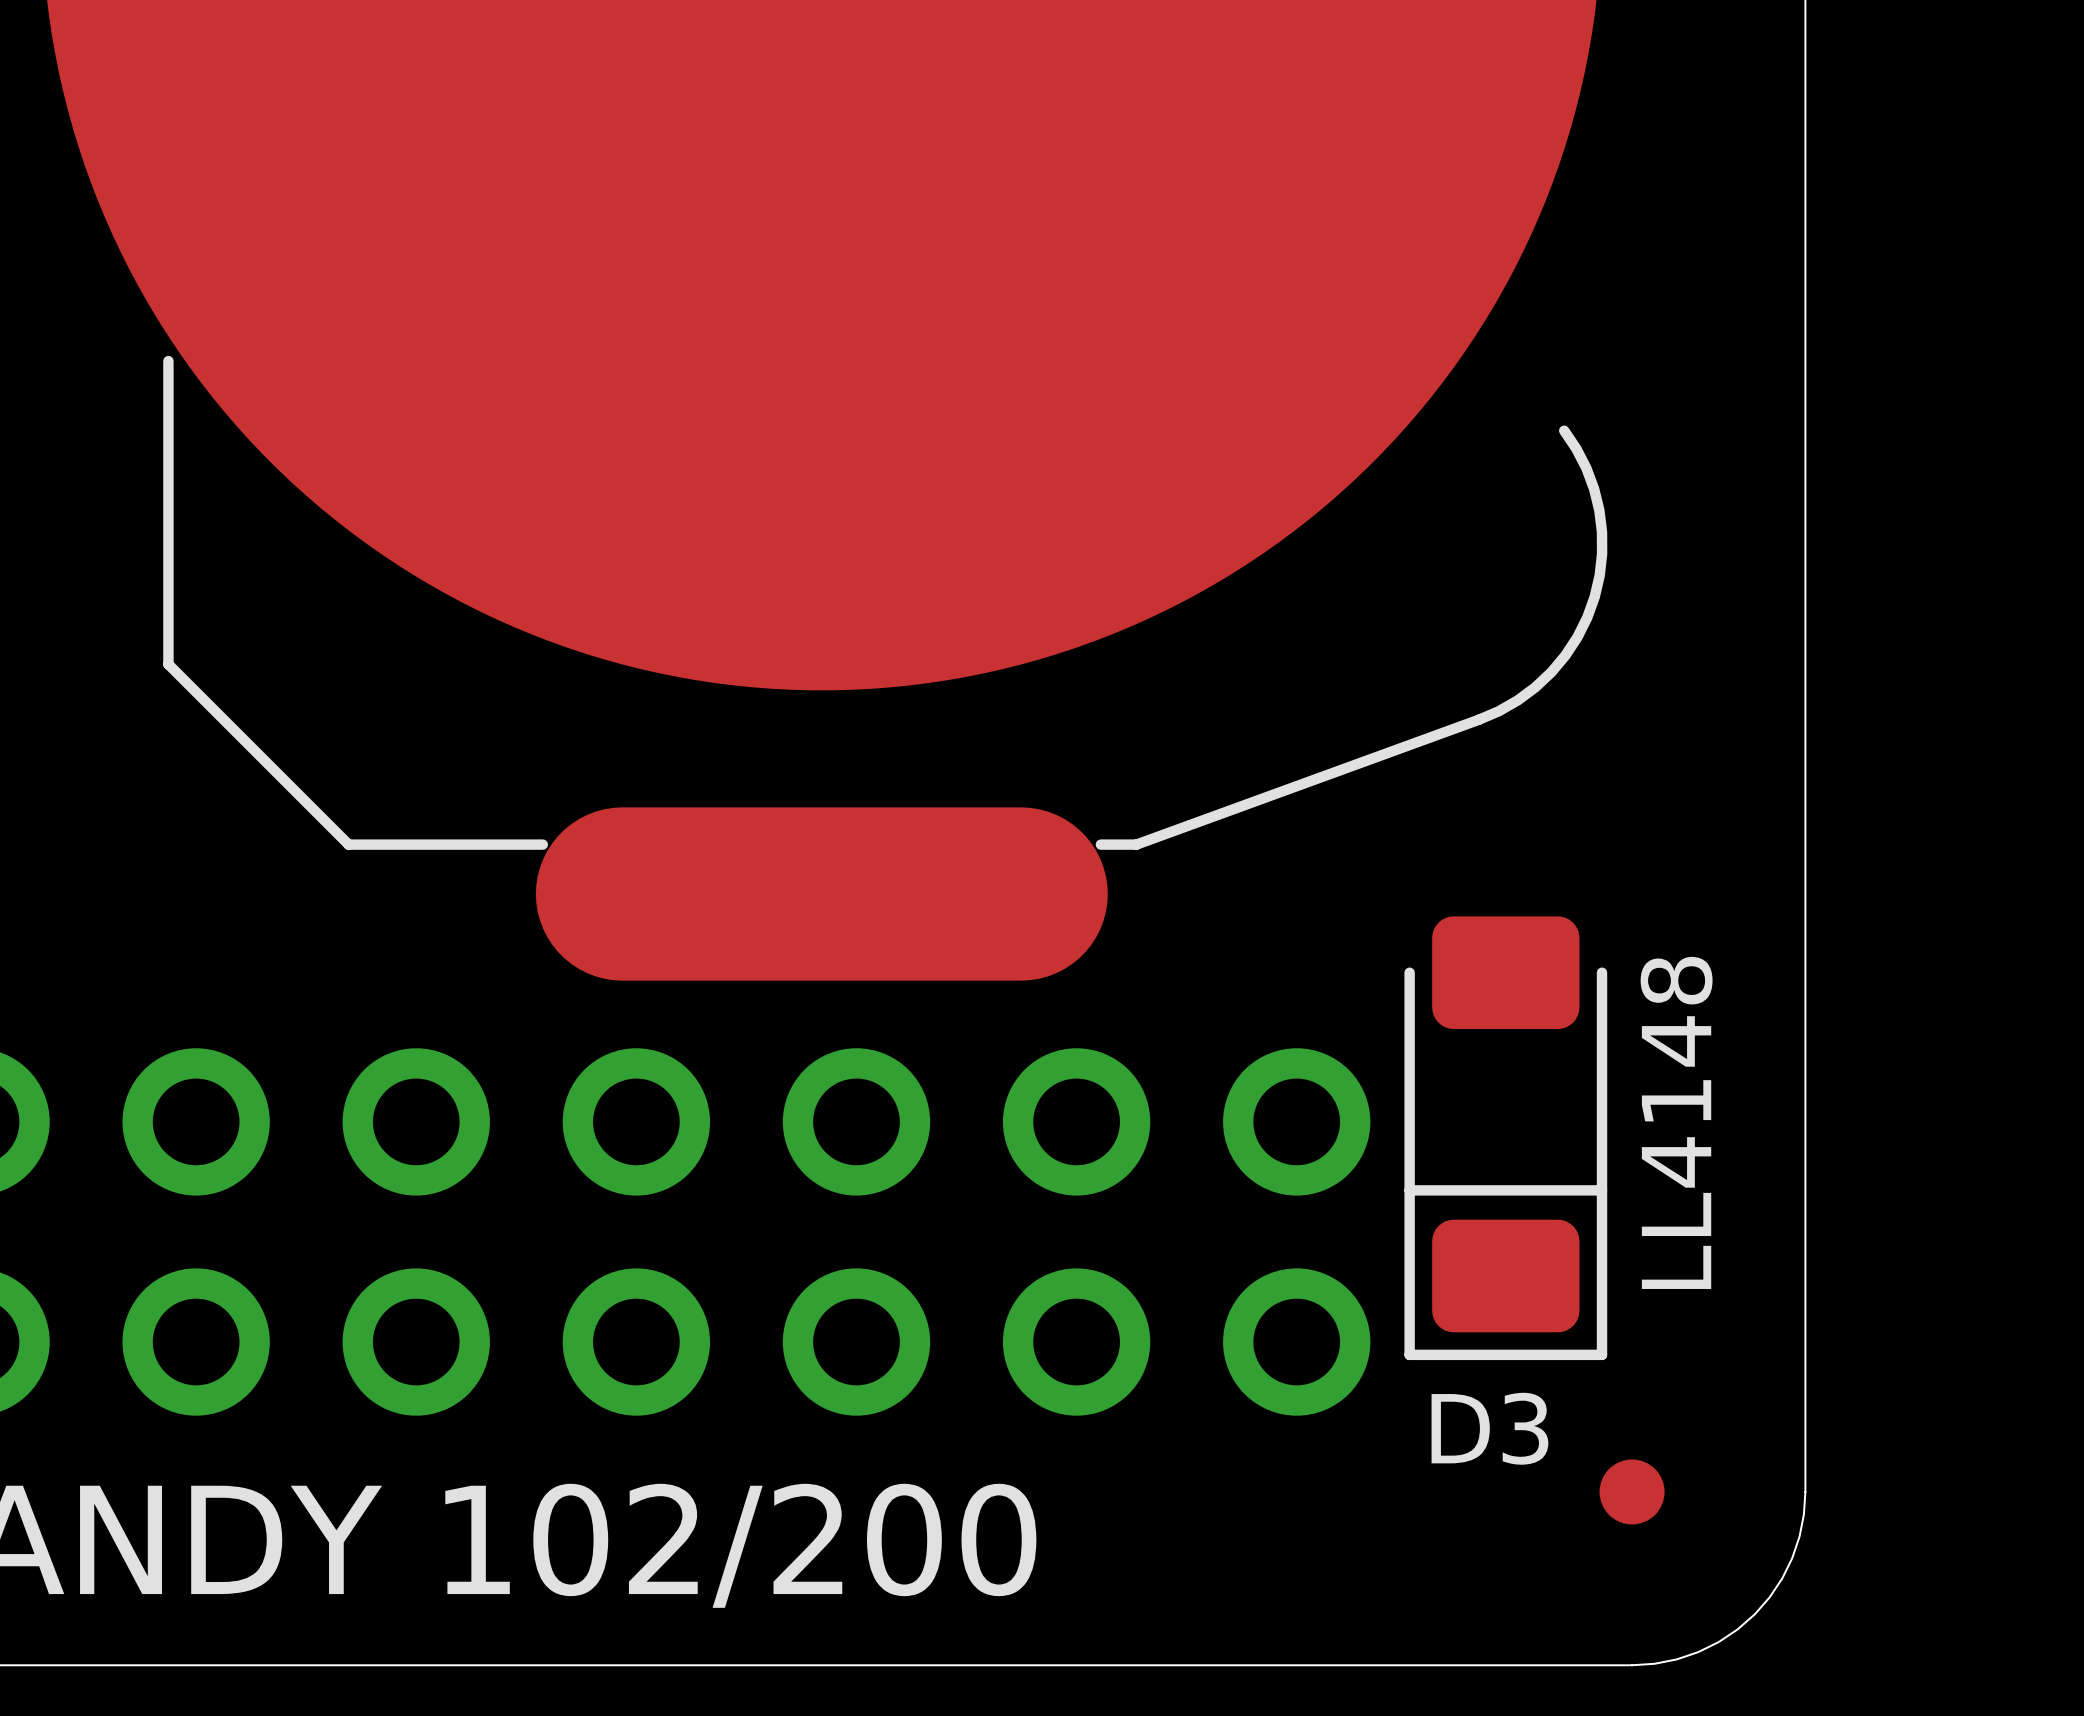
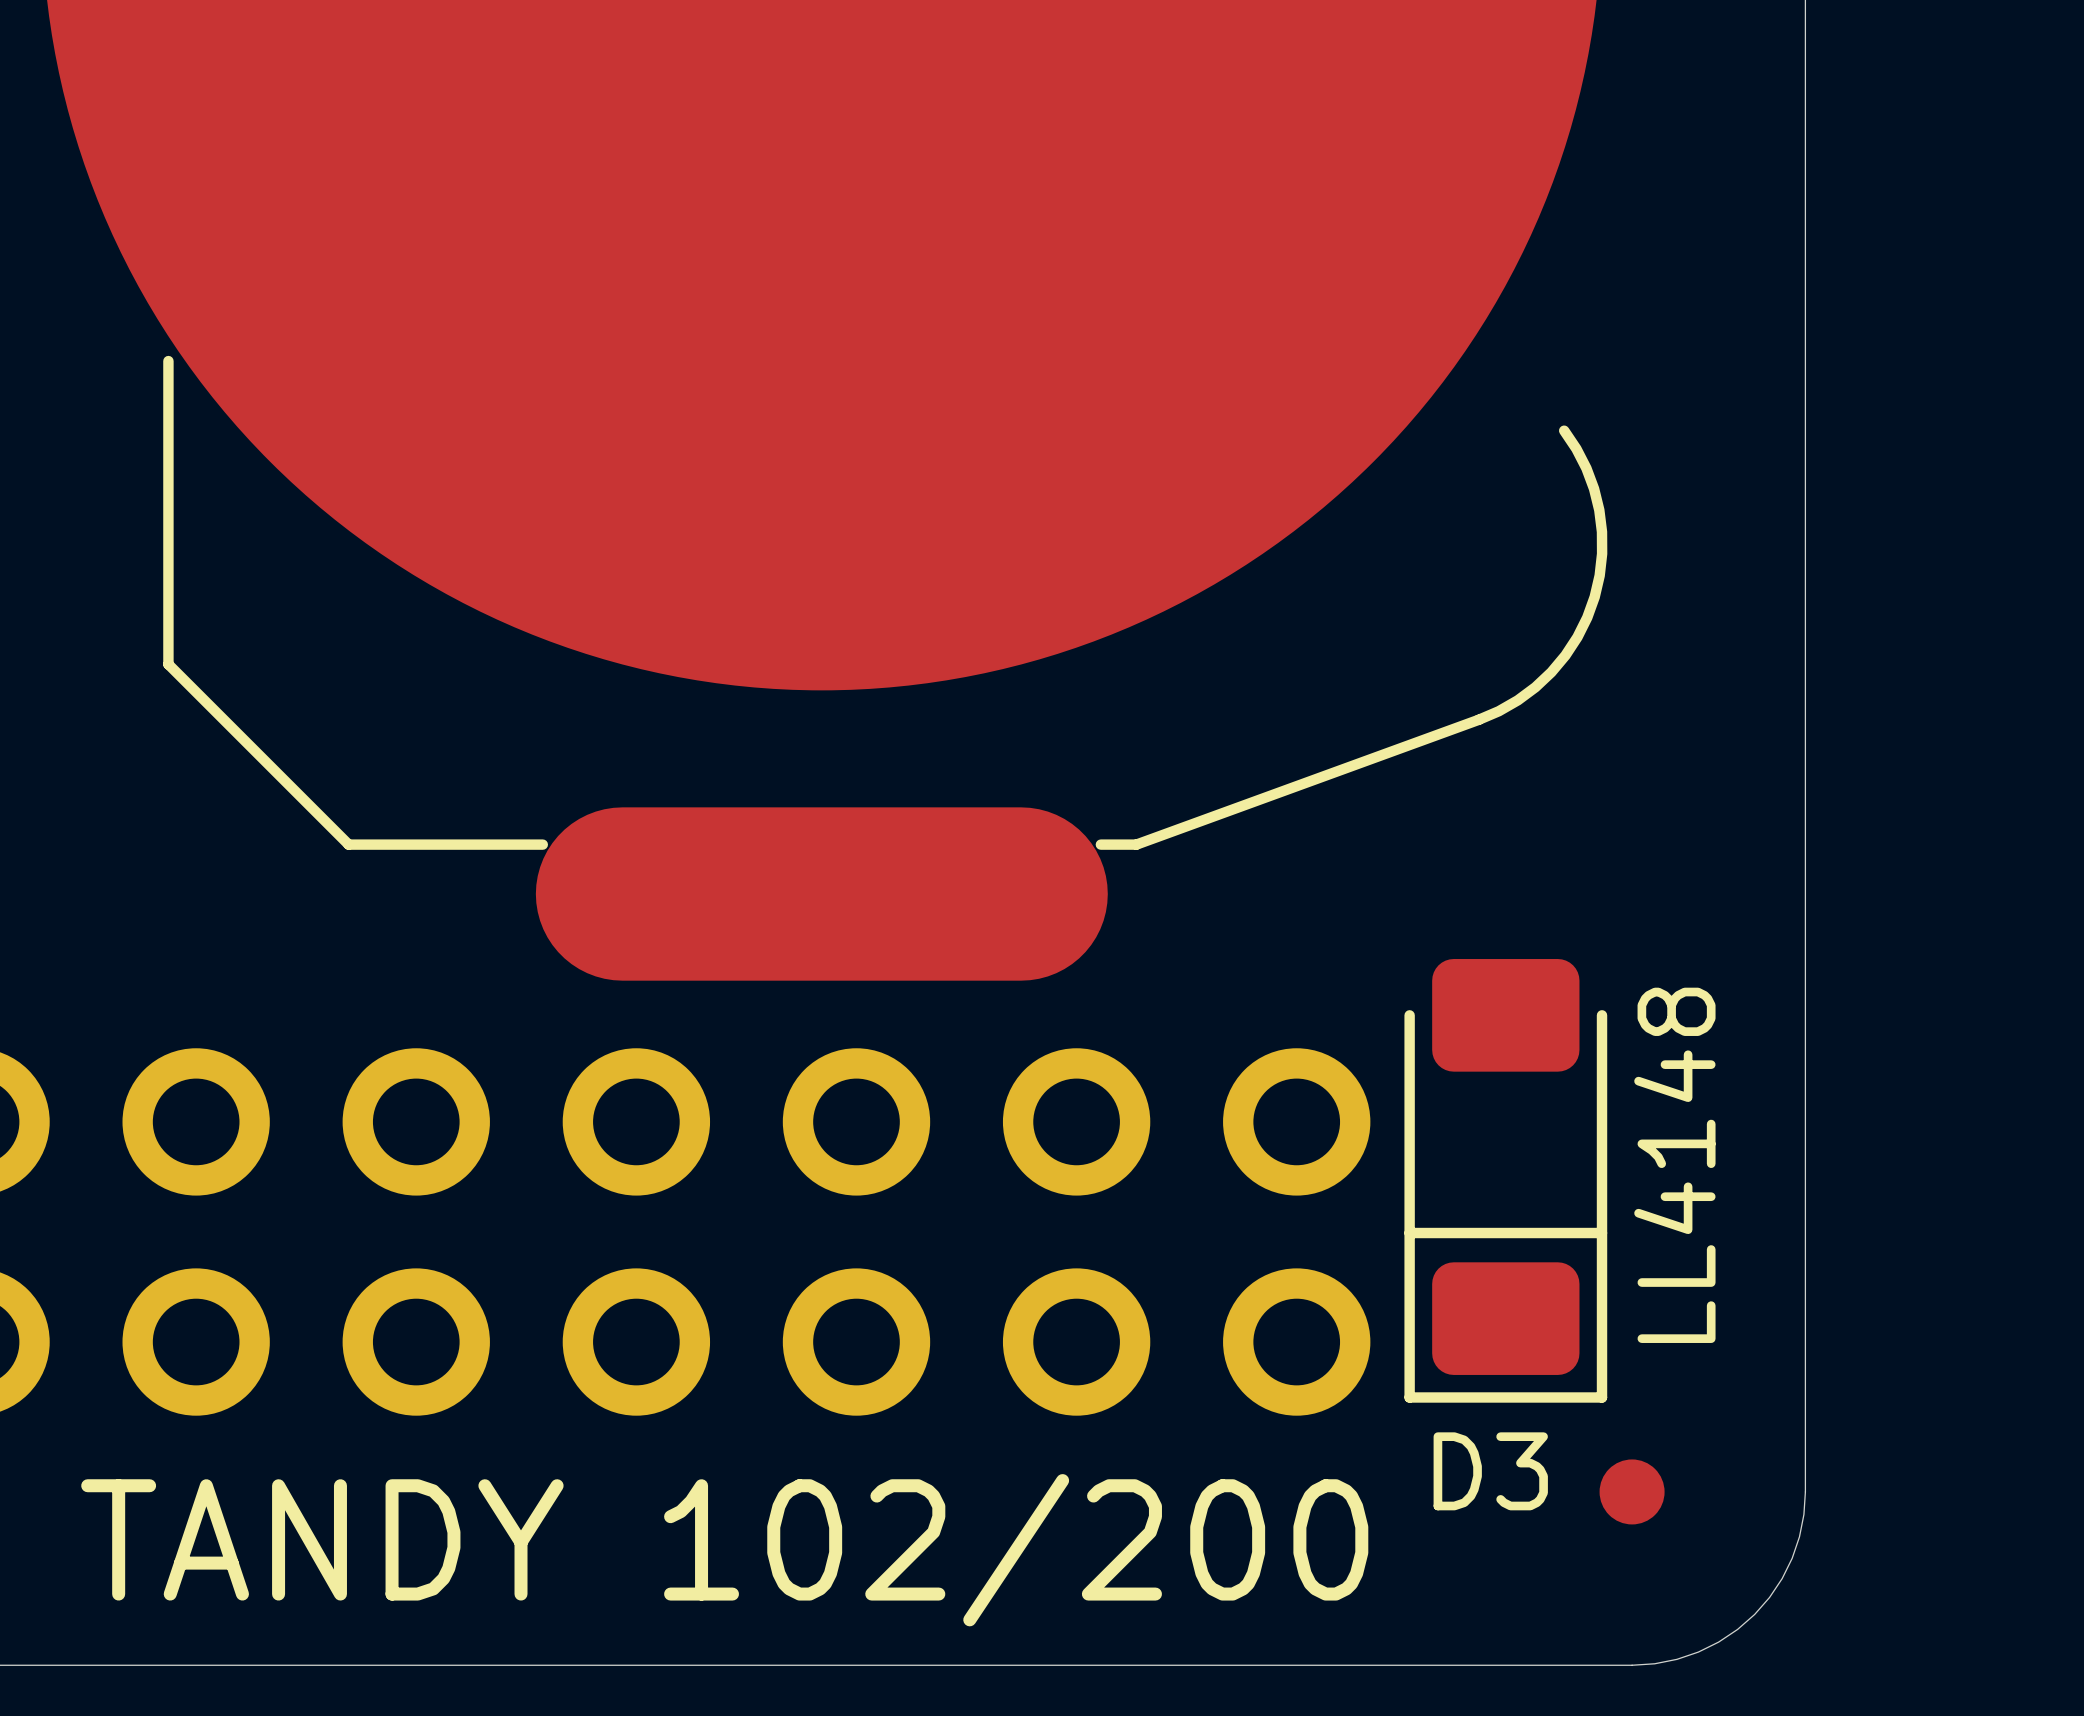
D3 position: (1505, 1138) -> (1505, 1180)

